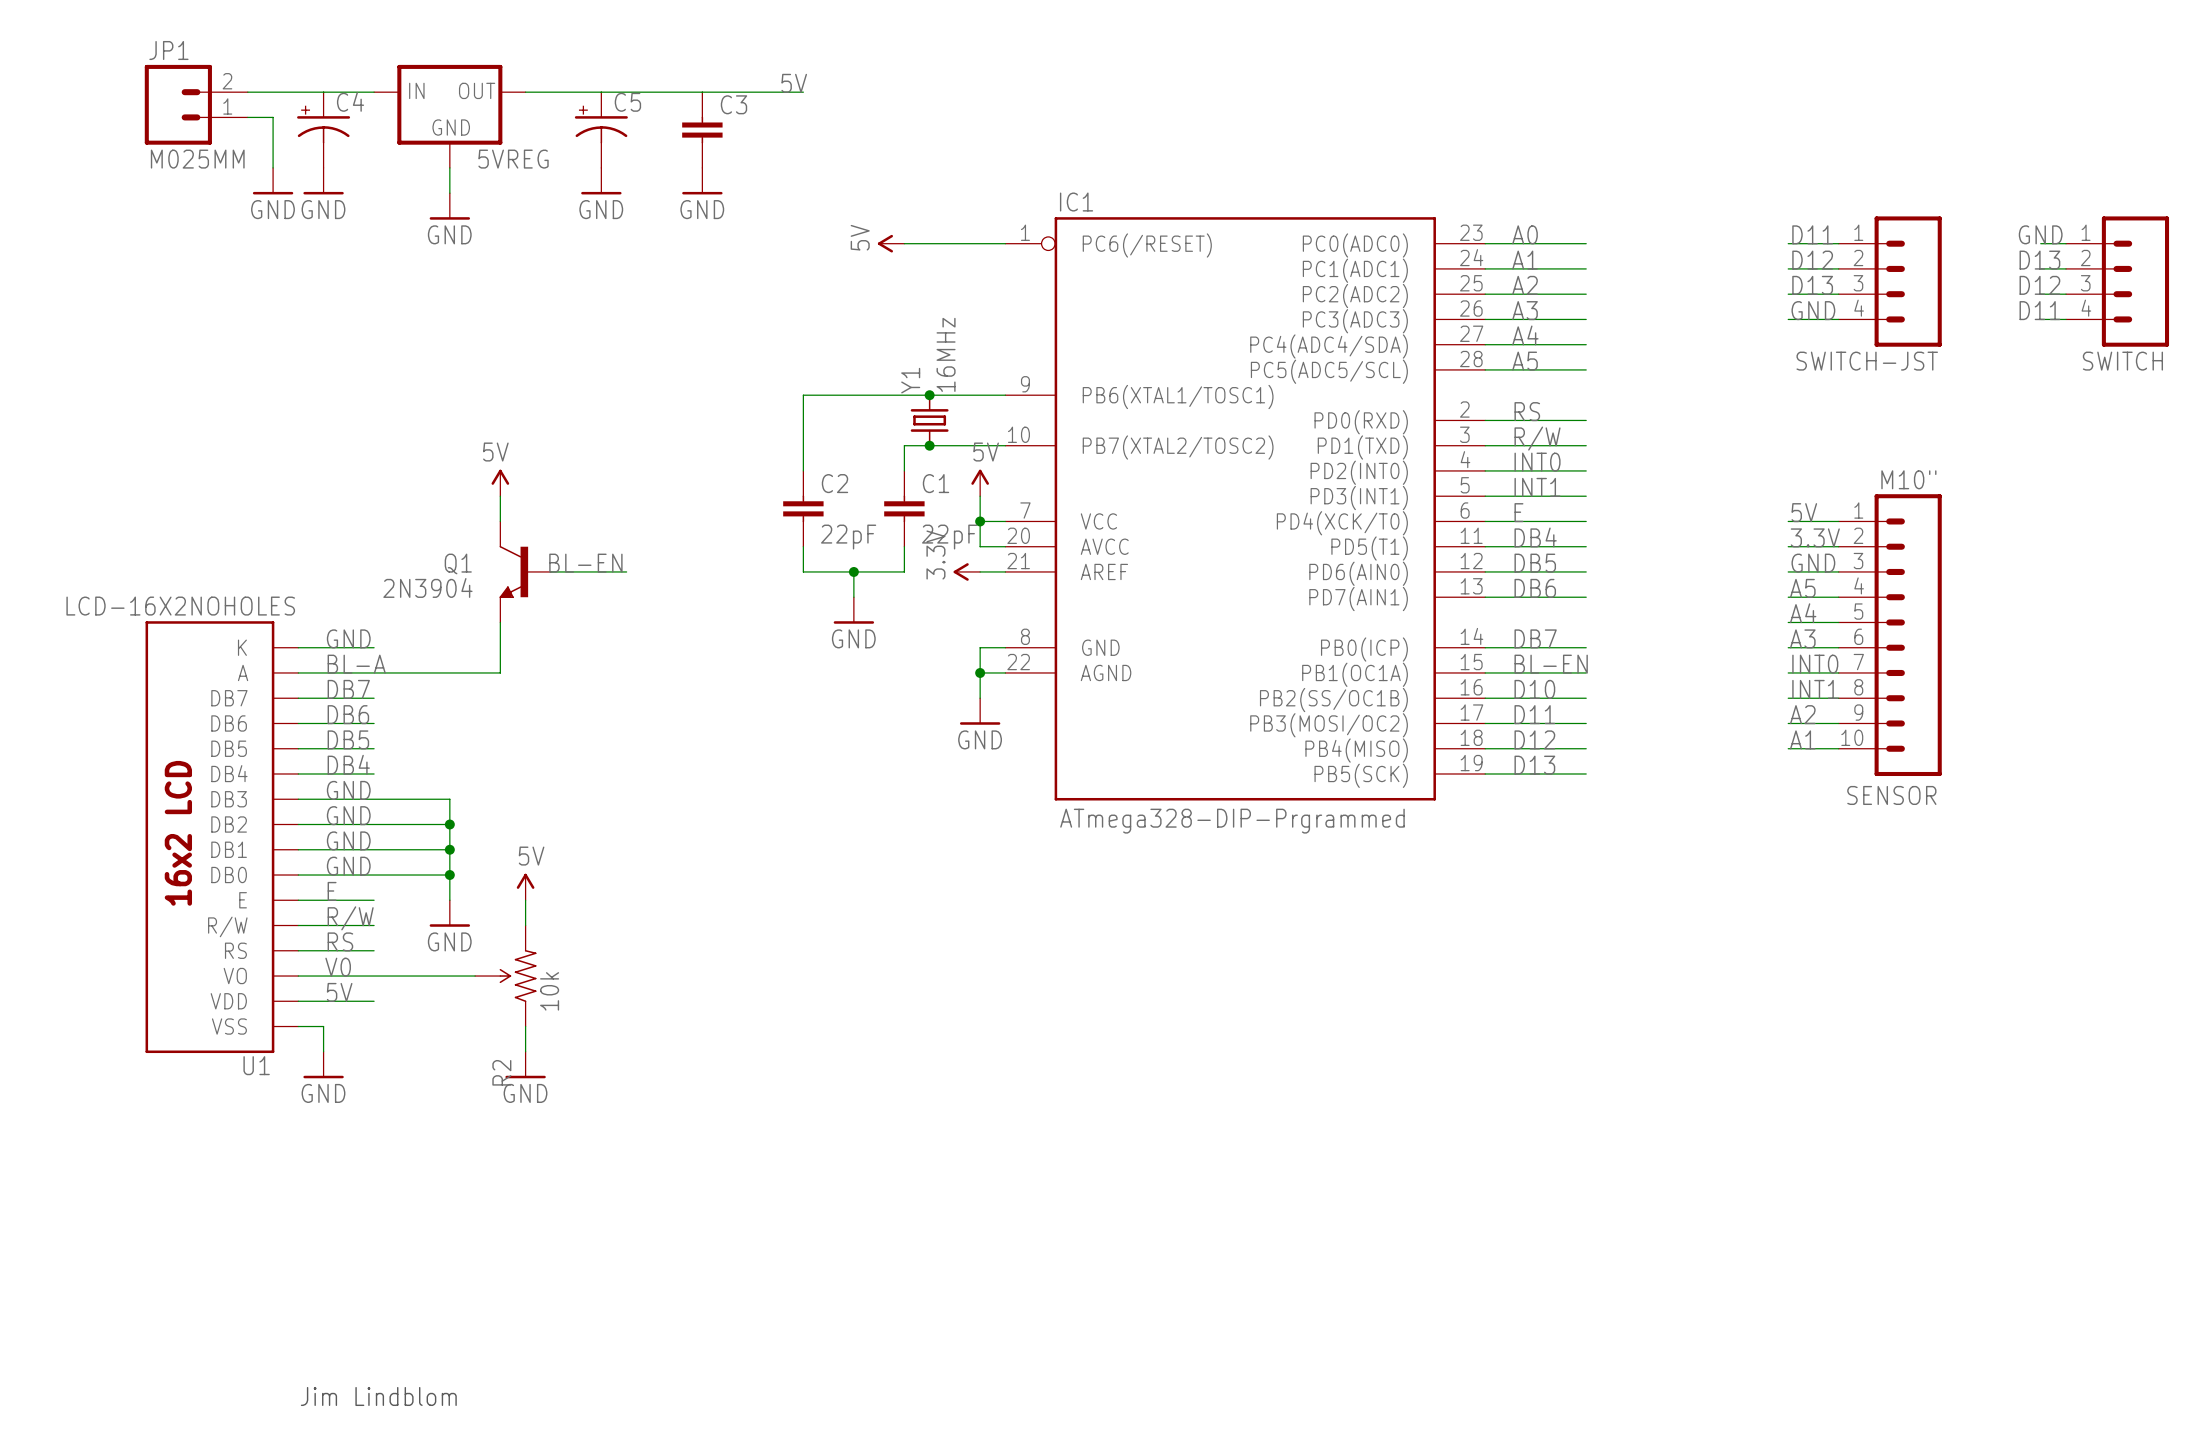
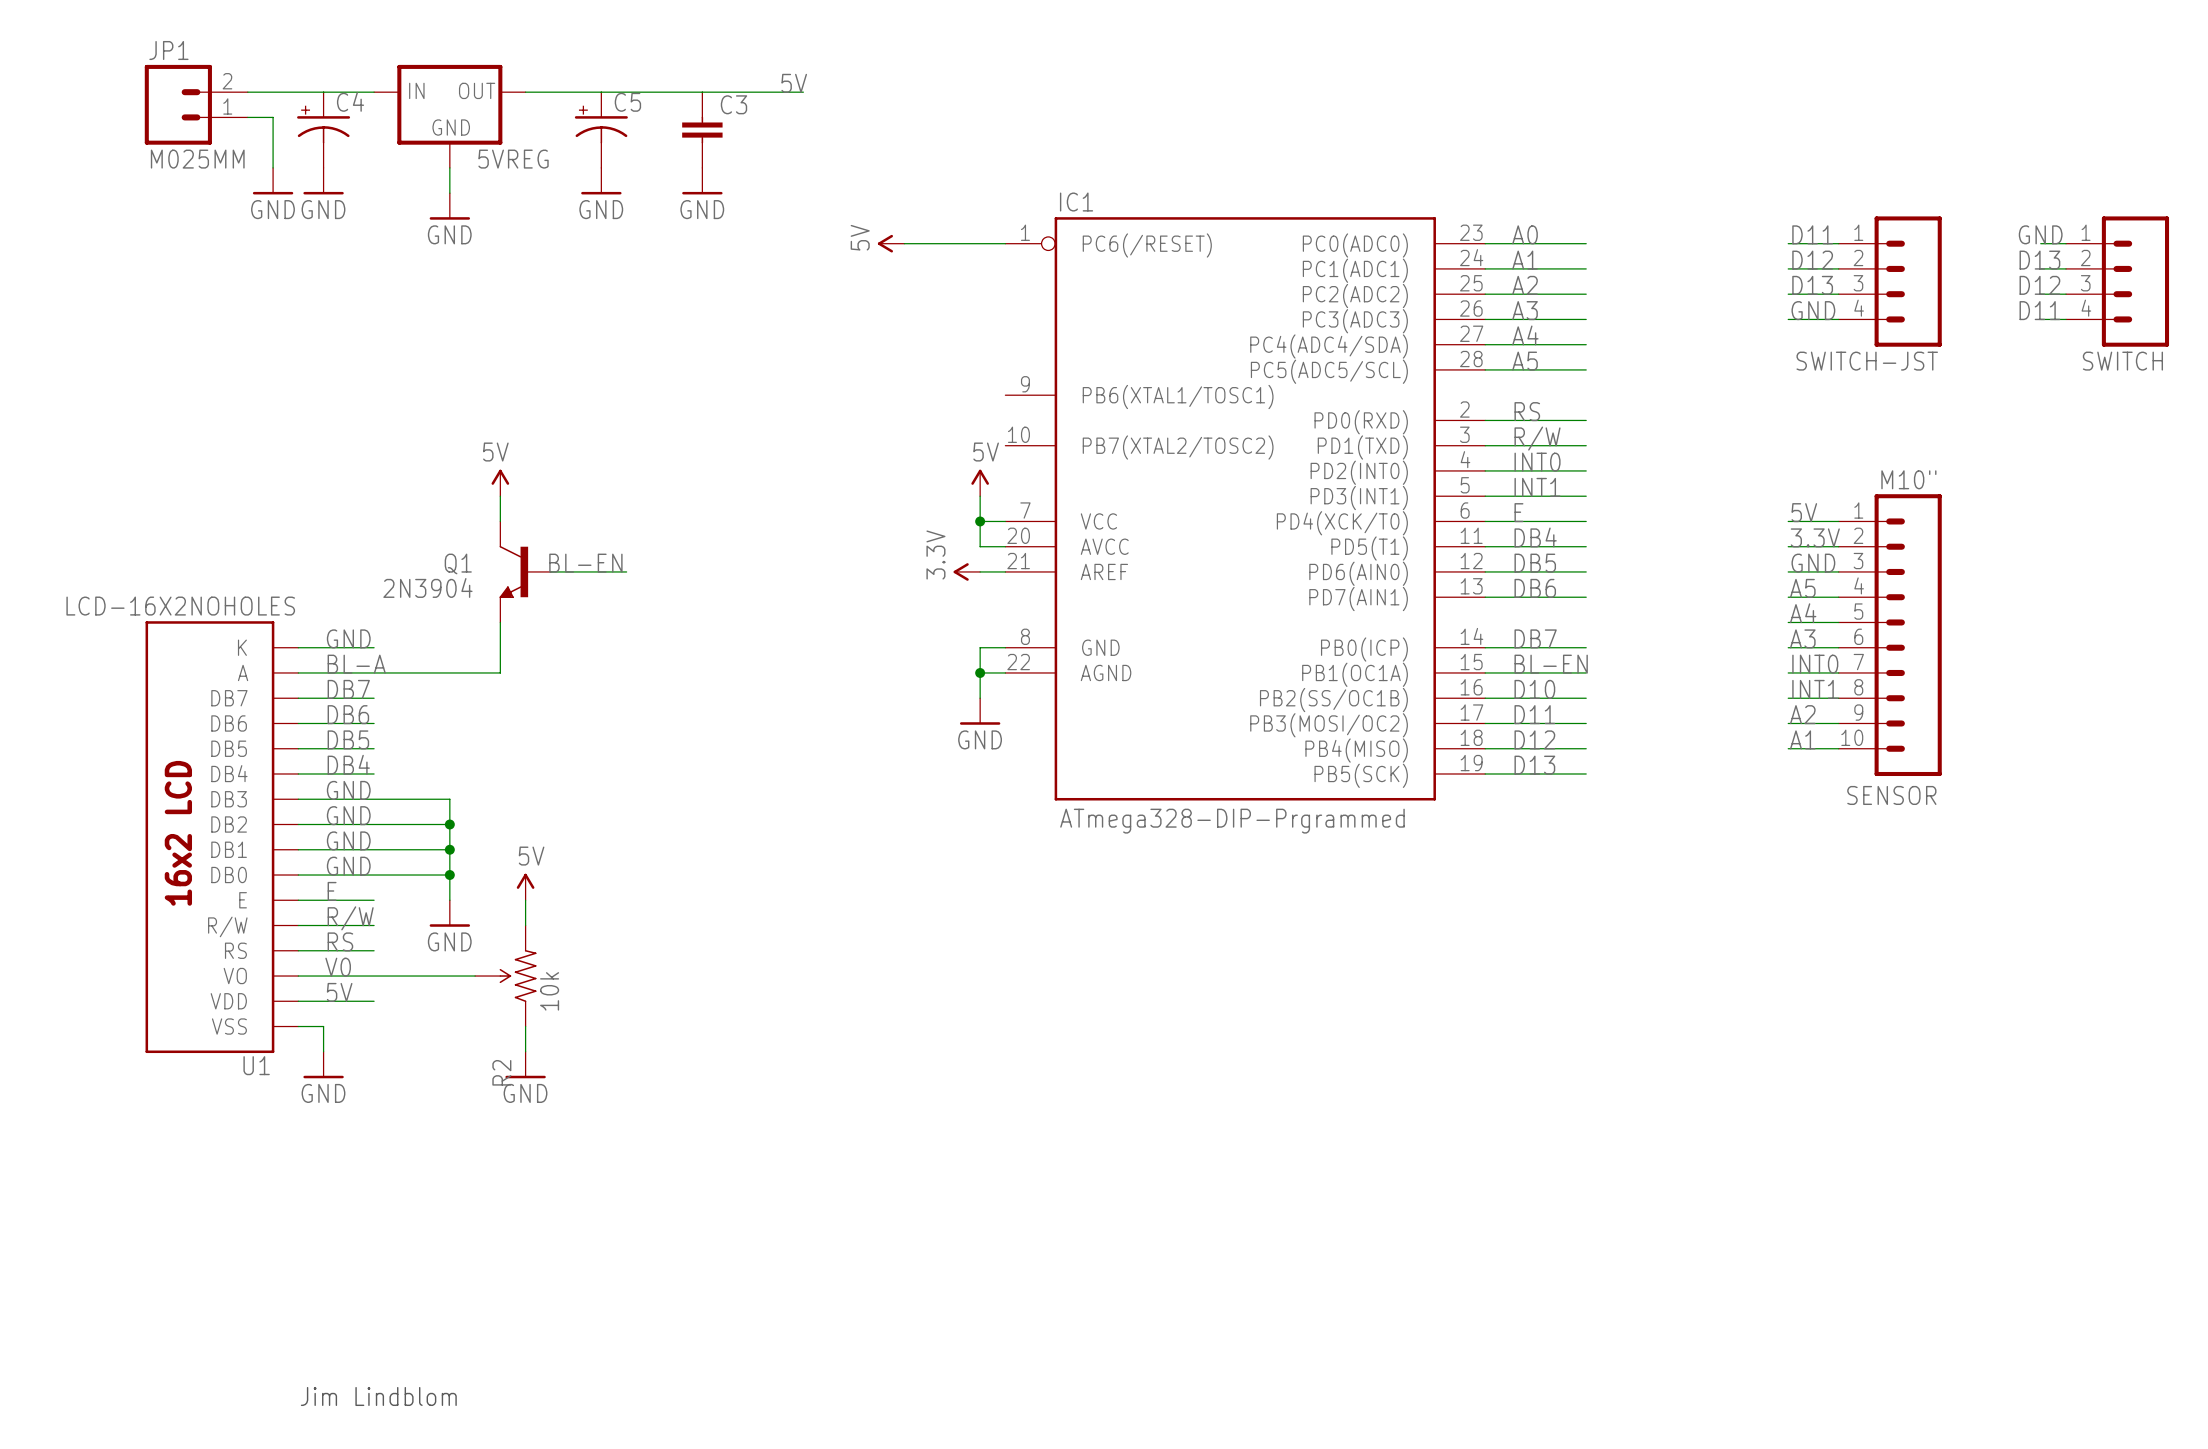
junction: (929, 395) -> none
wire: (1005, 395) (803, 395) (803, 470) -> none
Y1: 16MHz (929, 420) -> none
junction: (929, 445) -> none
wire: (1005, 445) (904, 445) (904, 470) -> none
C2: 22pF (803, 508) -> none
C1: 22pF (904, 508) -> none
wire: (803, 546) (803, 571) (904, 571) (904, 546) -> none
wire: (853, 571) (853, 597) -> none
junction: (853, 571) -> none
power symbol: GND (853, 610) -> none

